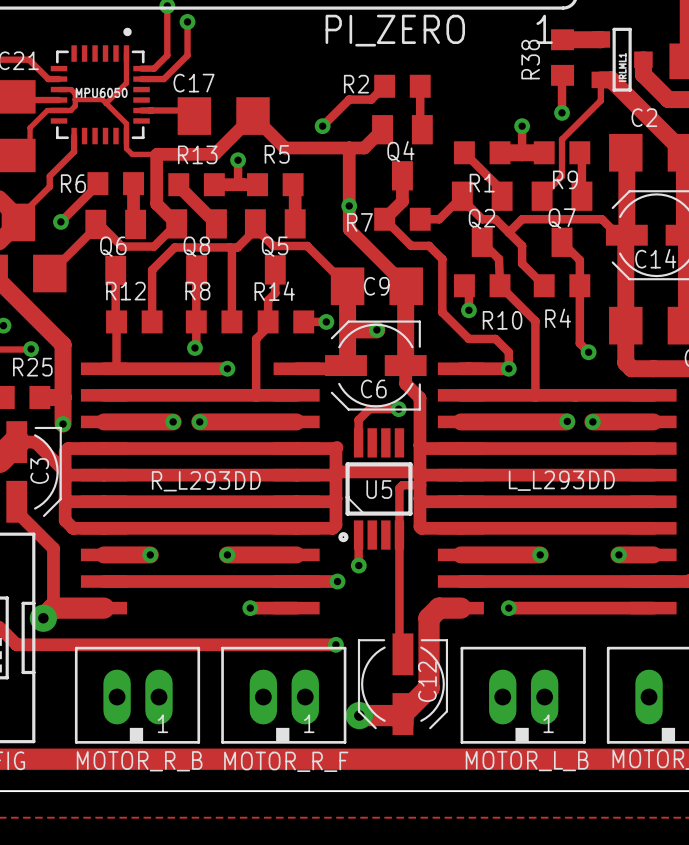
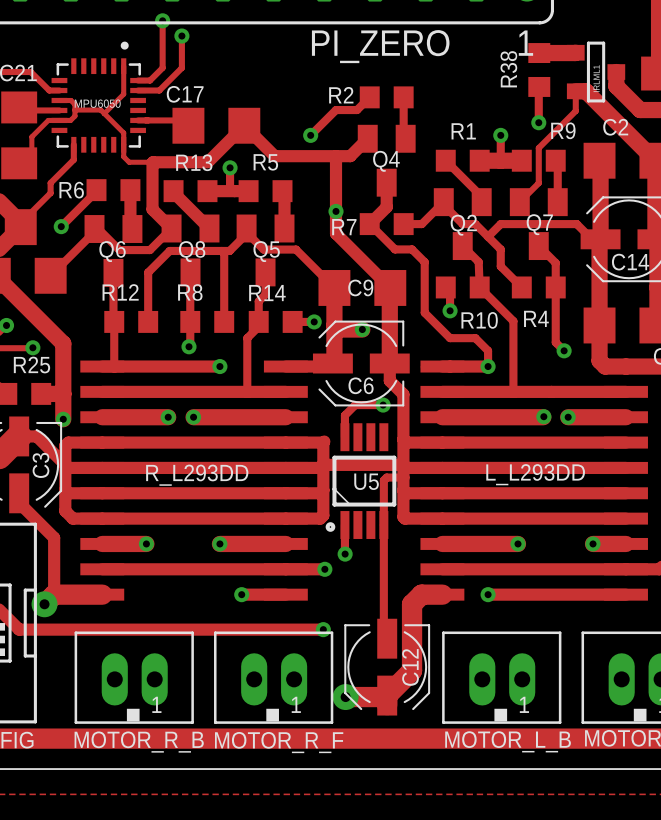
R9 name position: R9 (565, 179) -> R9 (563, 130)
R1 name position: R1 (482, 183) -> R1 (463, 131)

